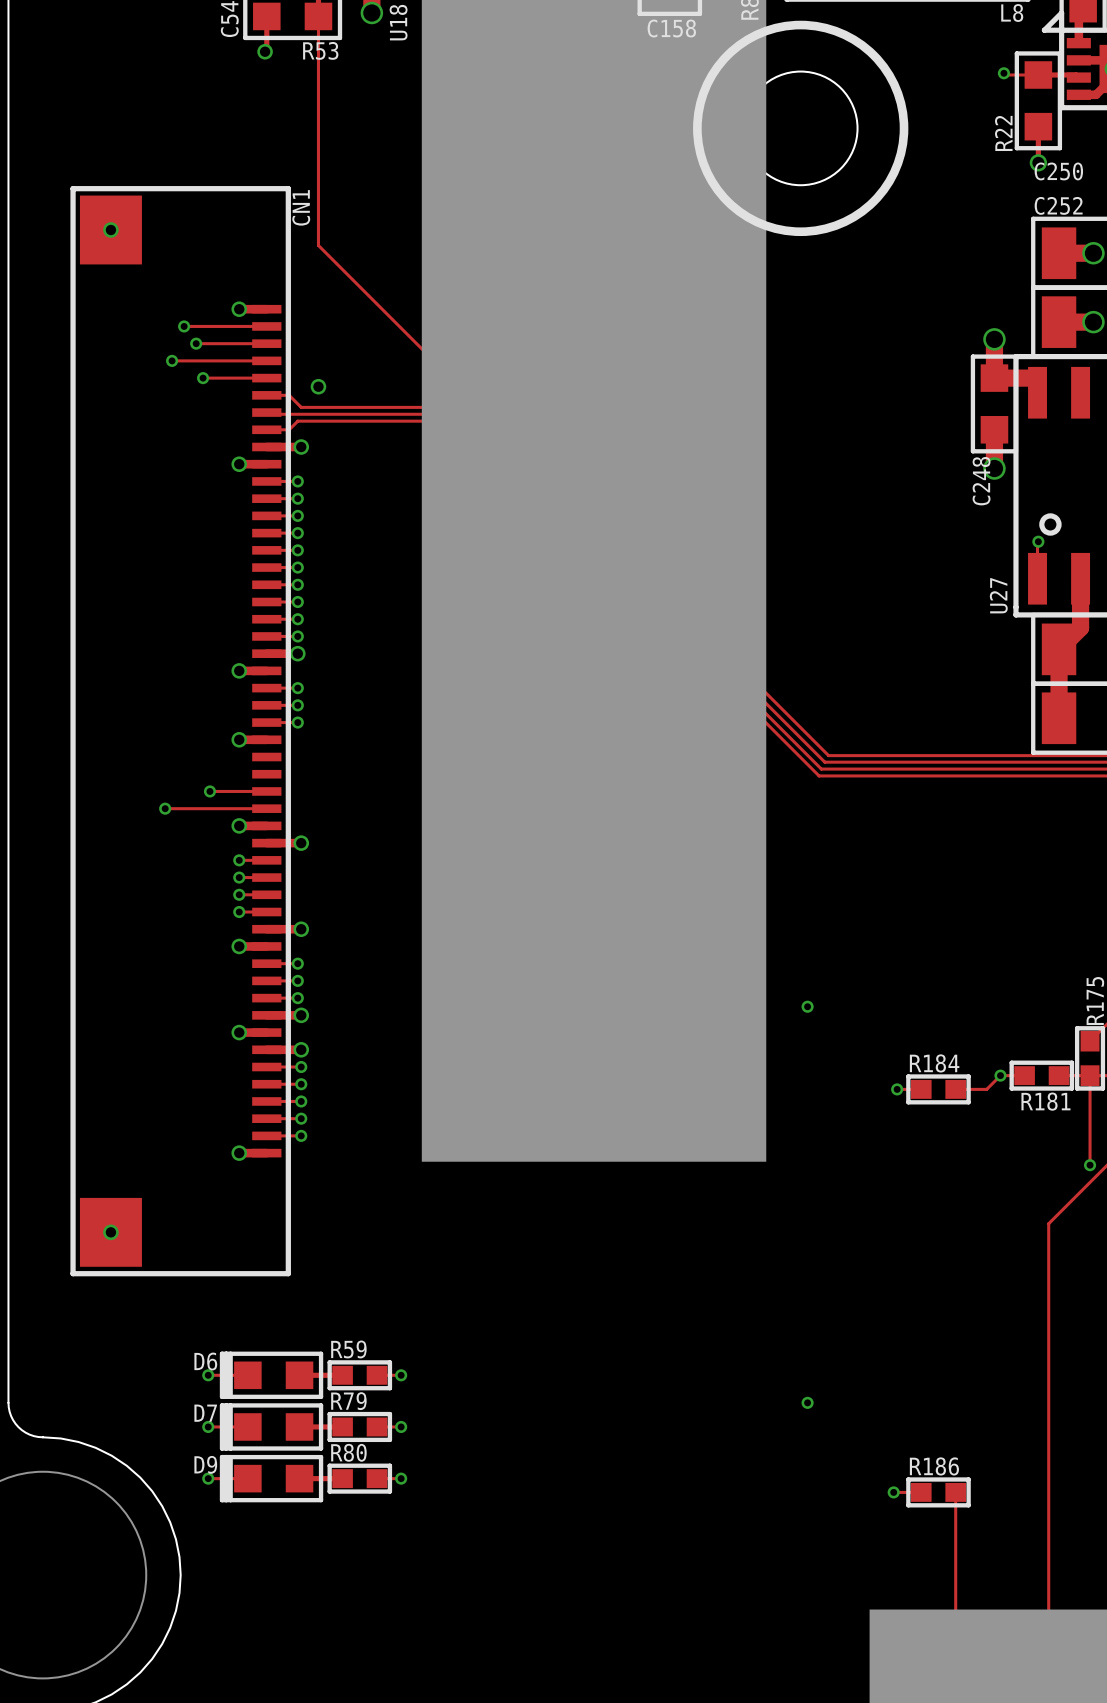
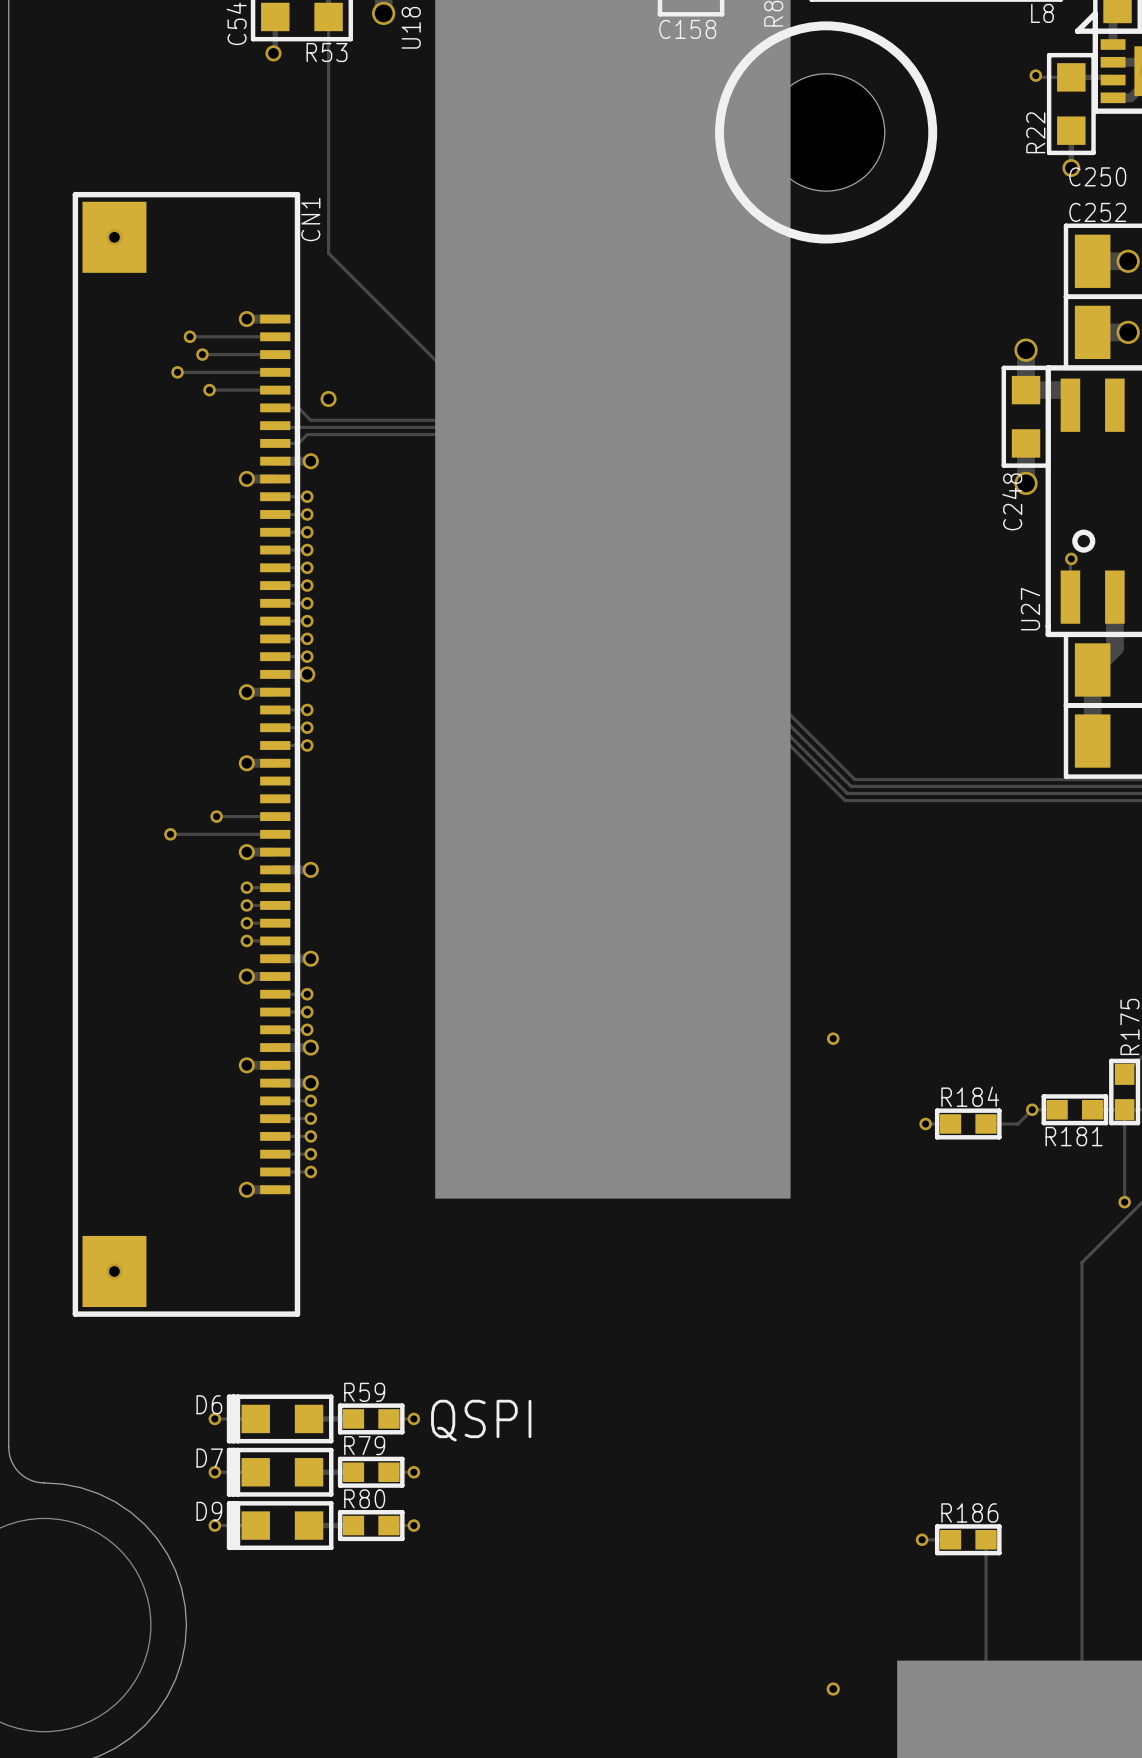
text: none -> QSPI (481, 1420)
via: (807, 1402) -> none
via: none -> (833, 1689)

